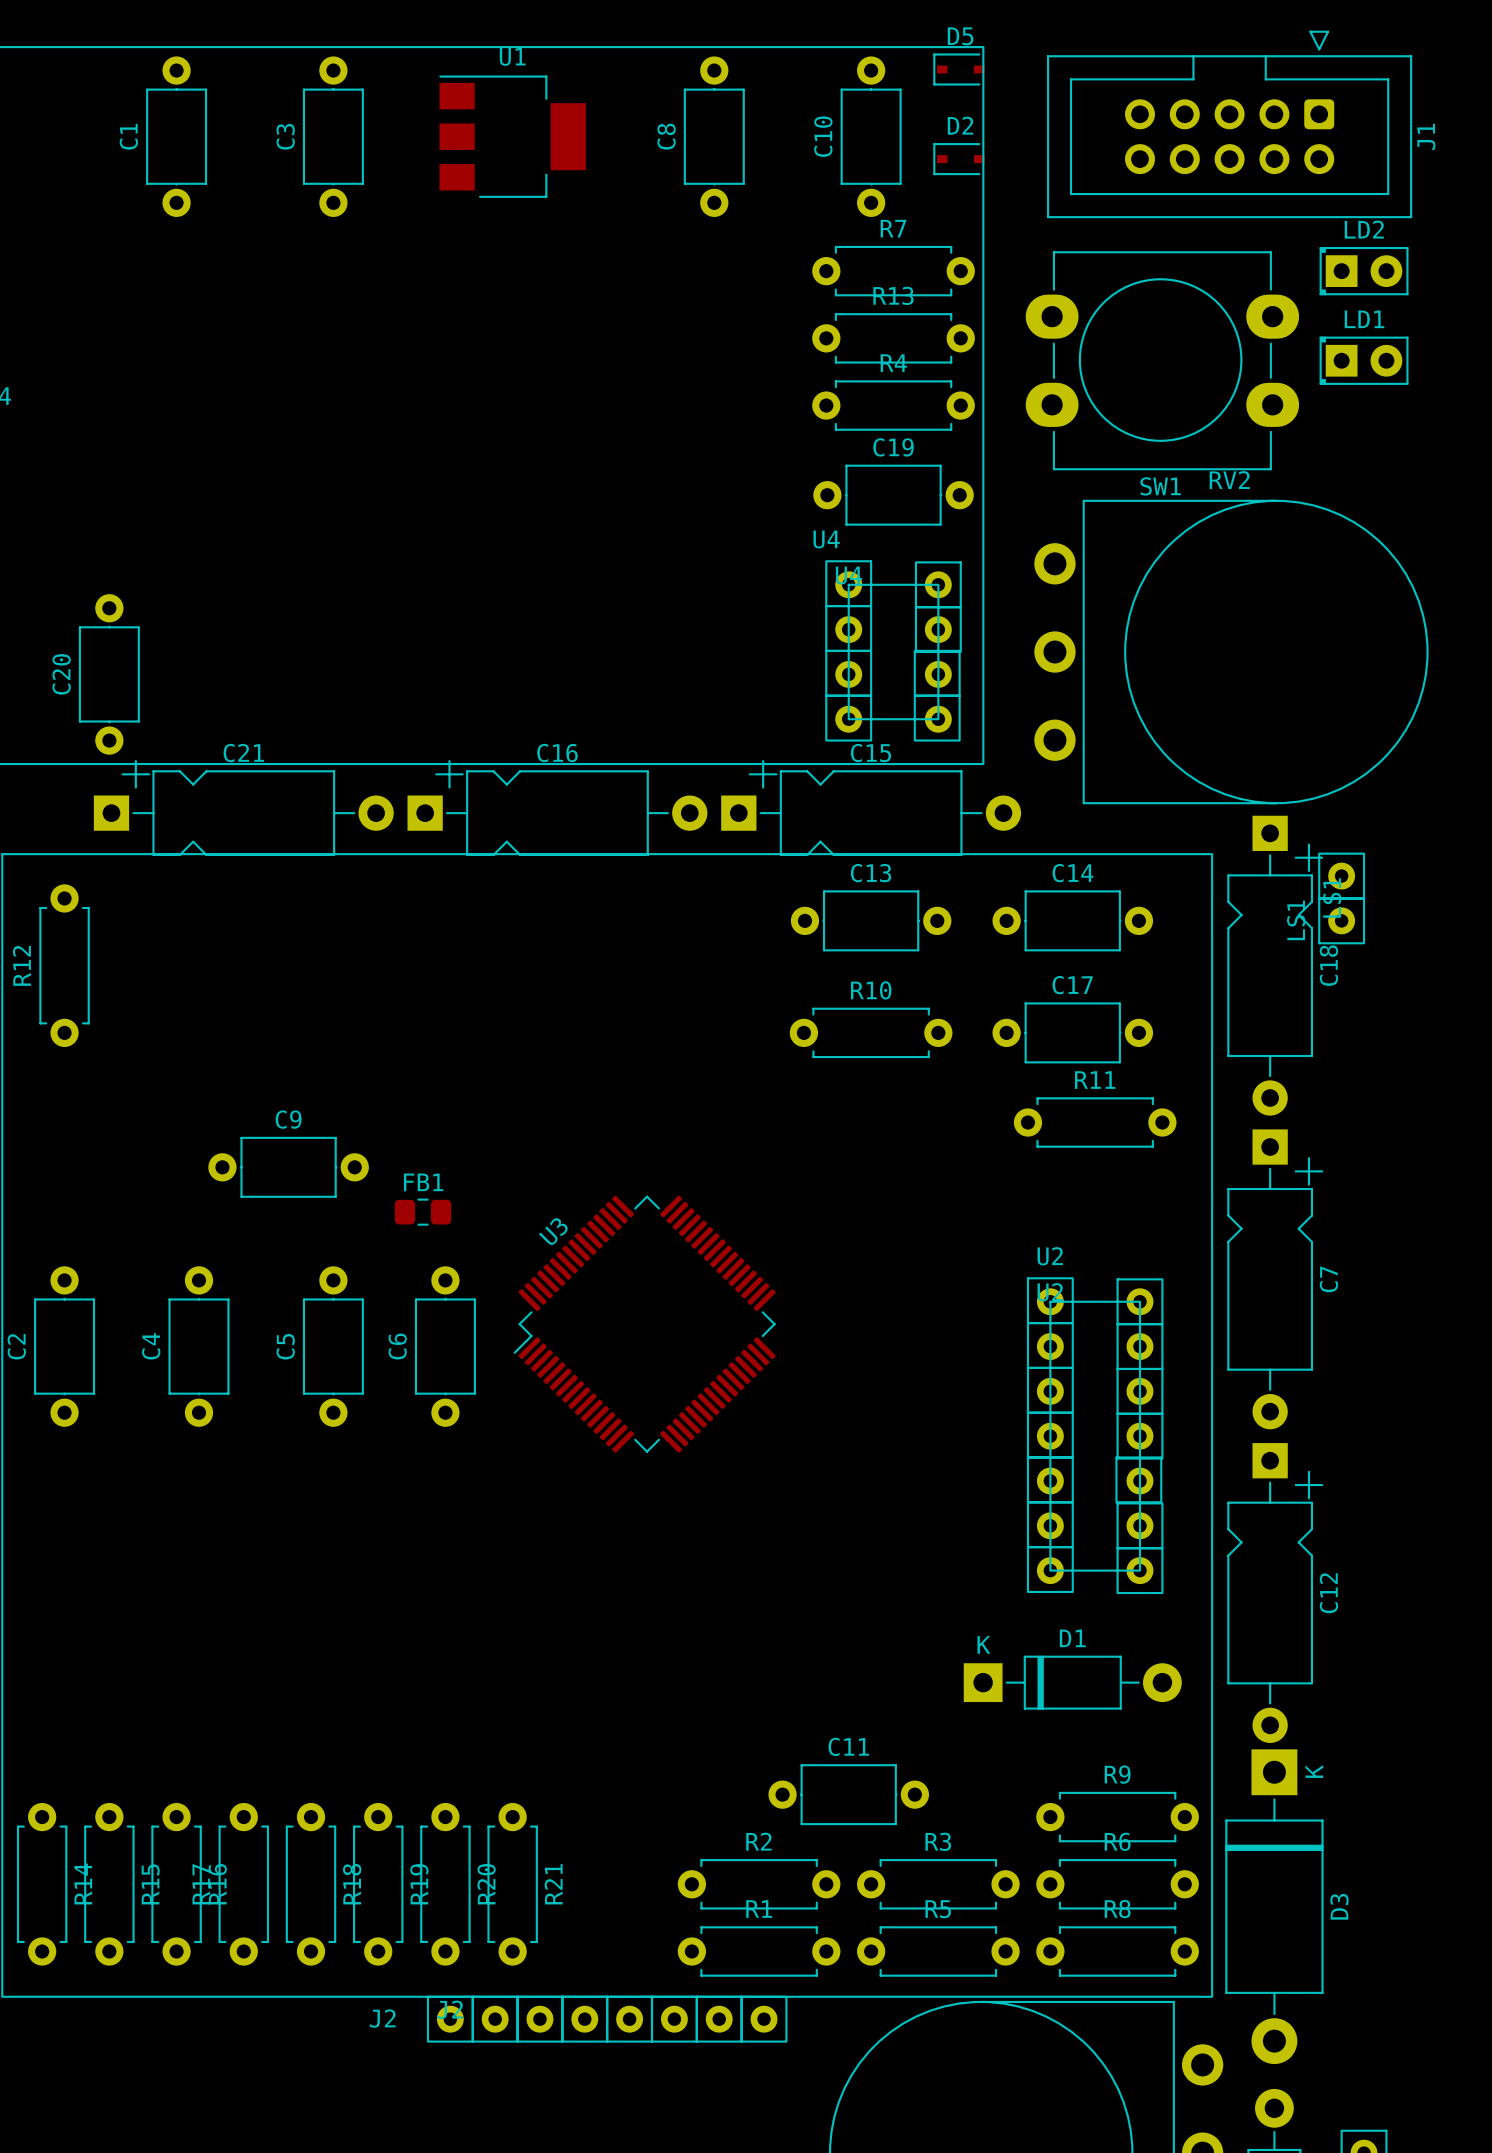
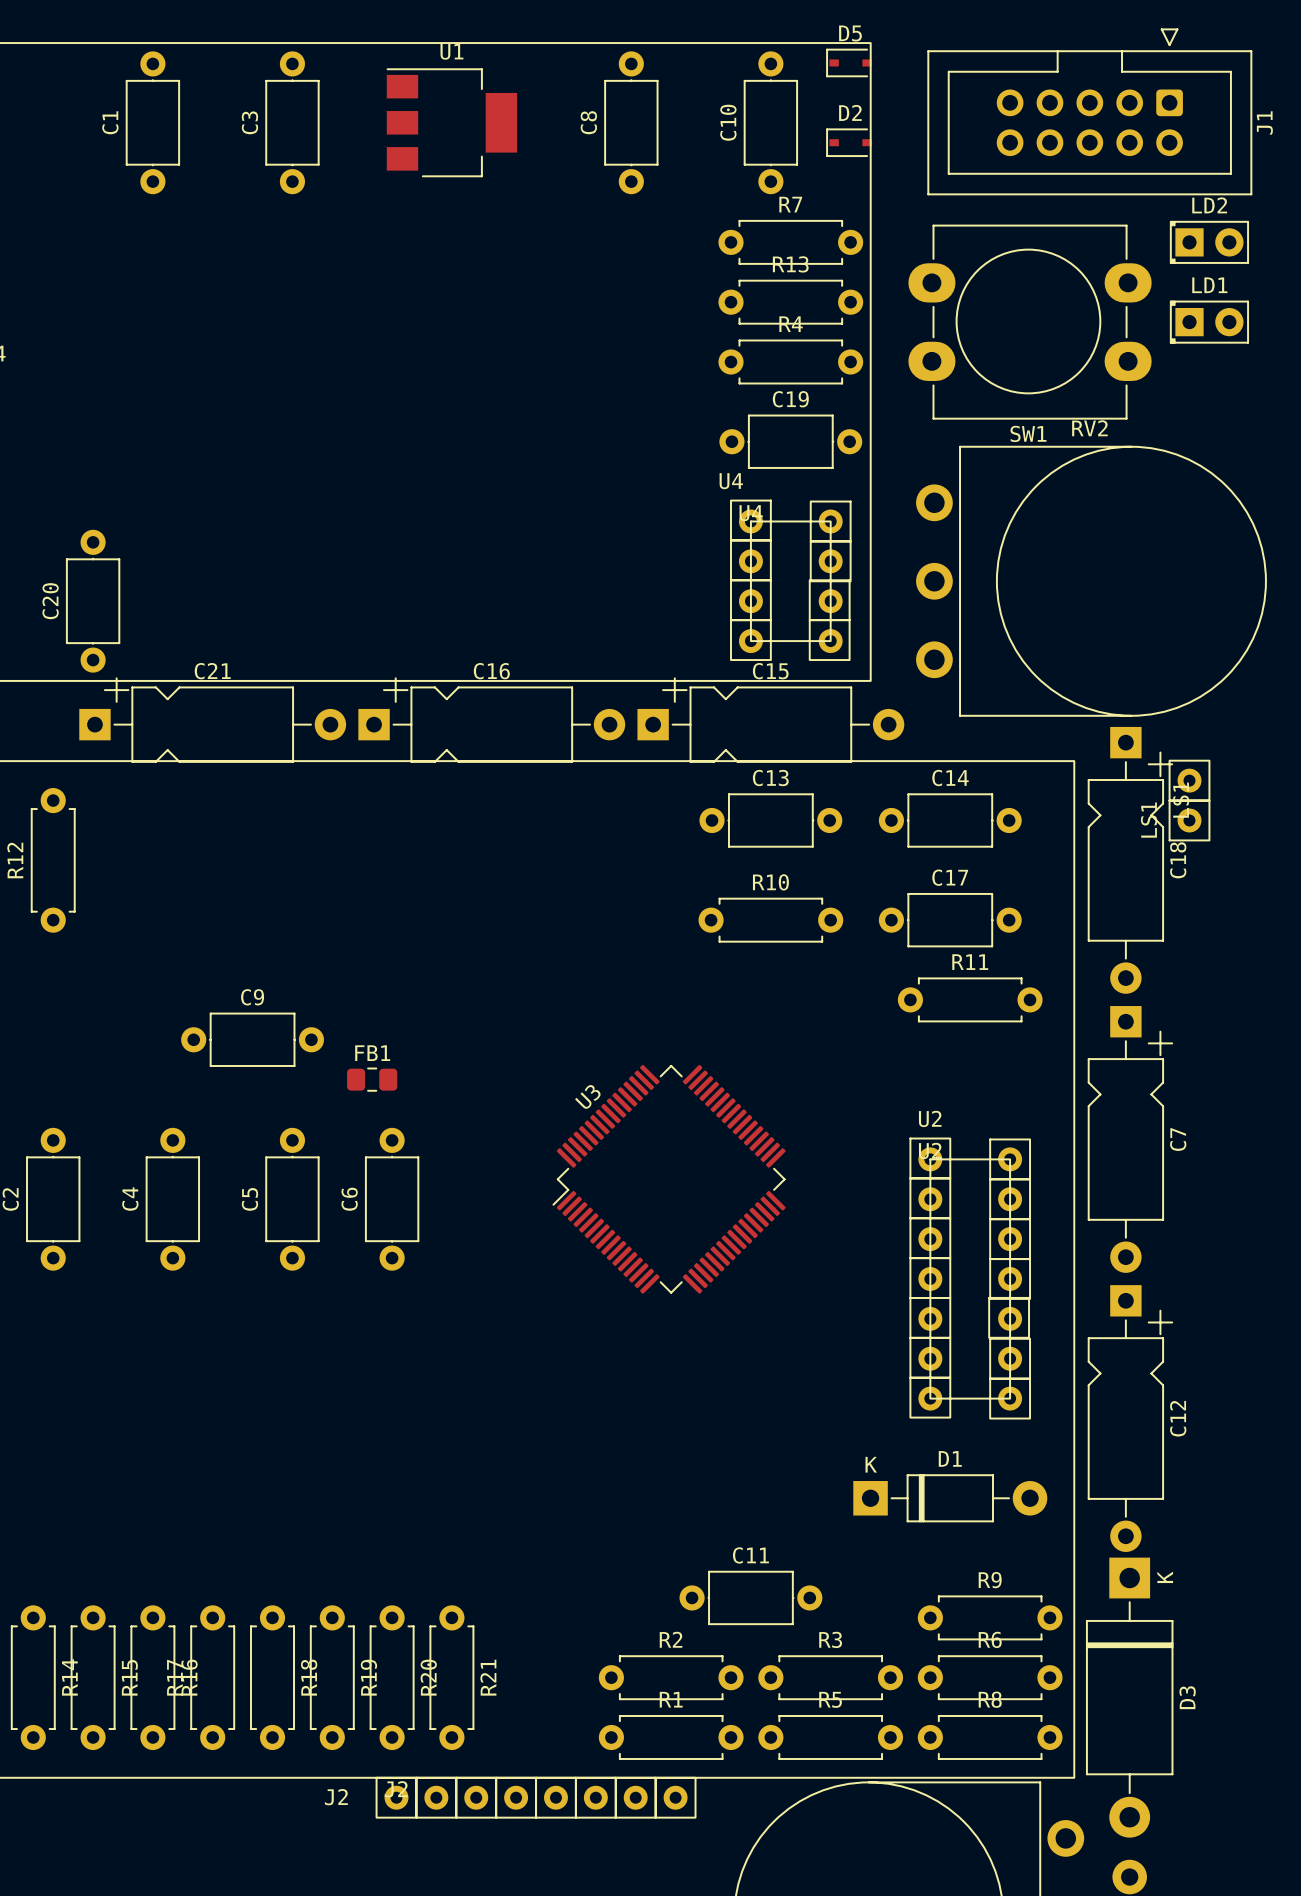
U3 position: (644, 1324) -> (669, 1179)

